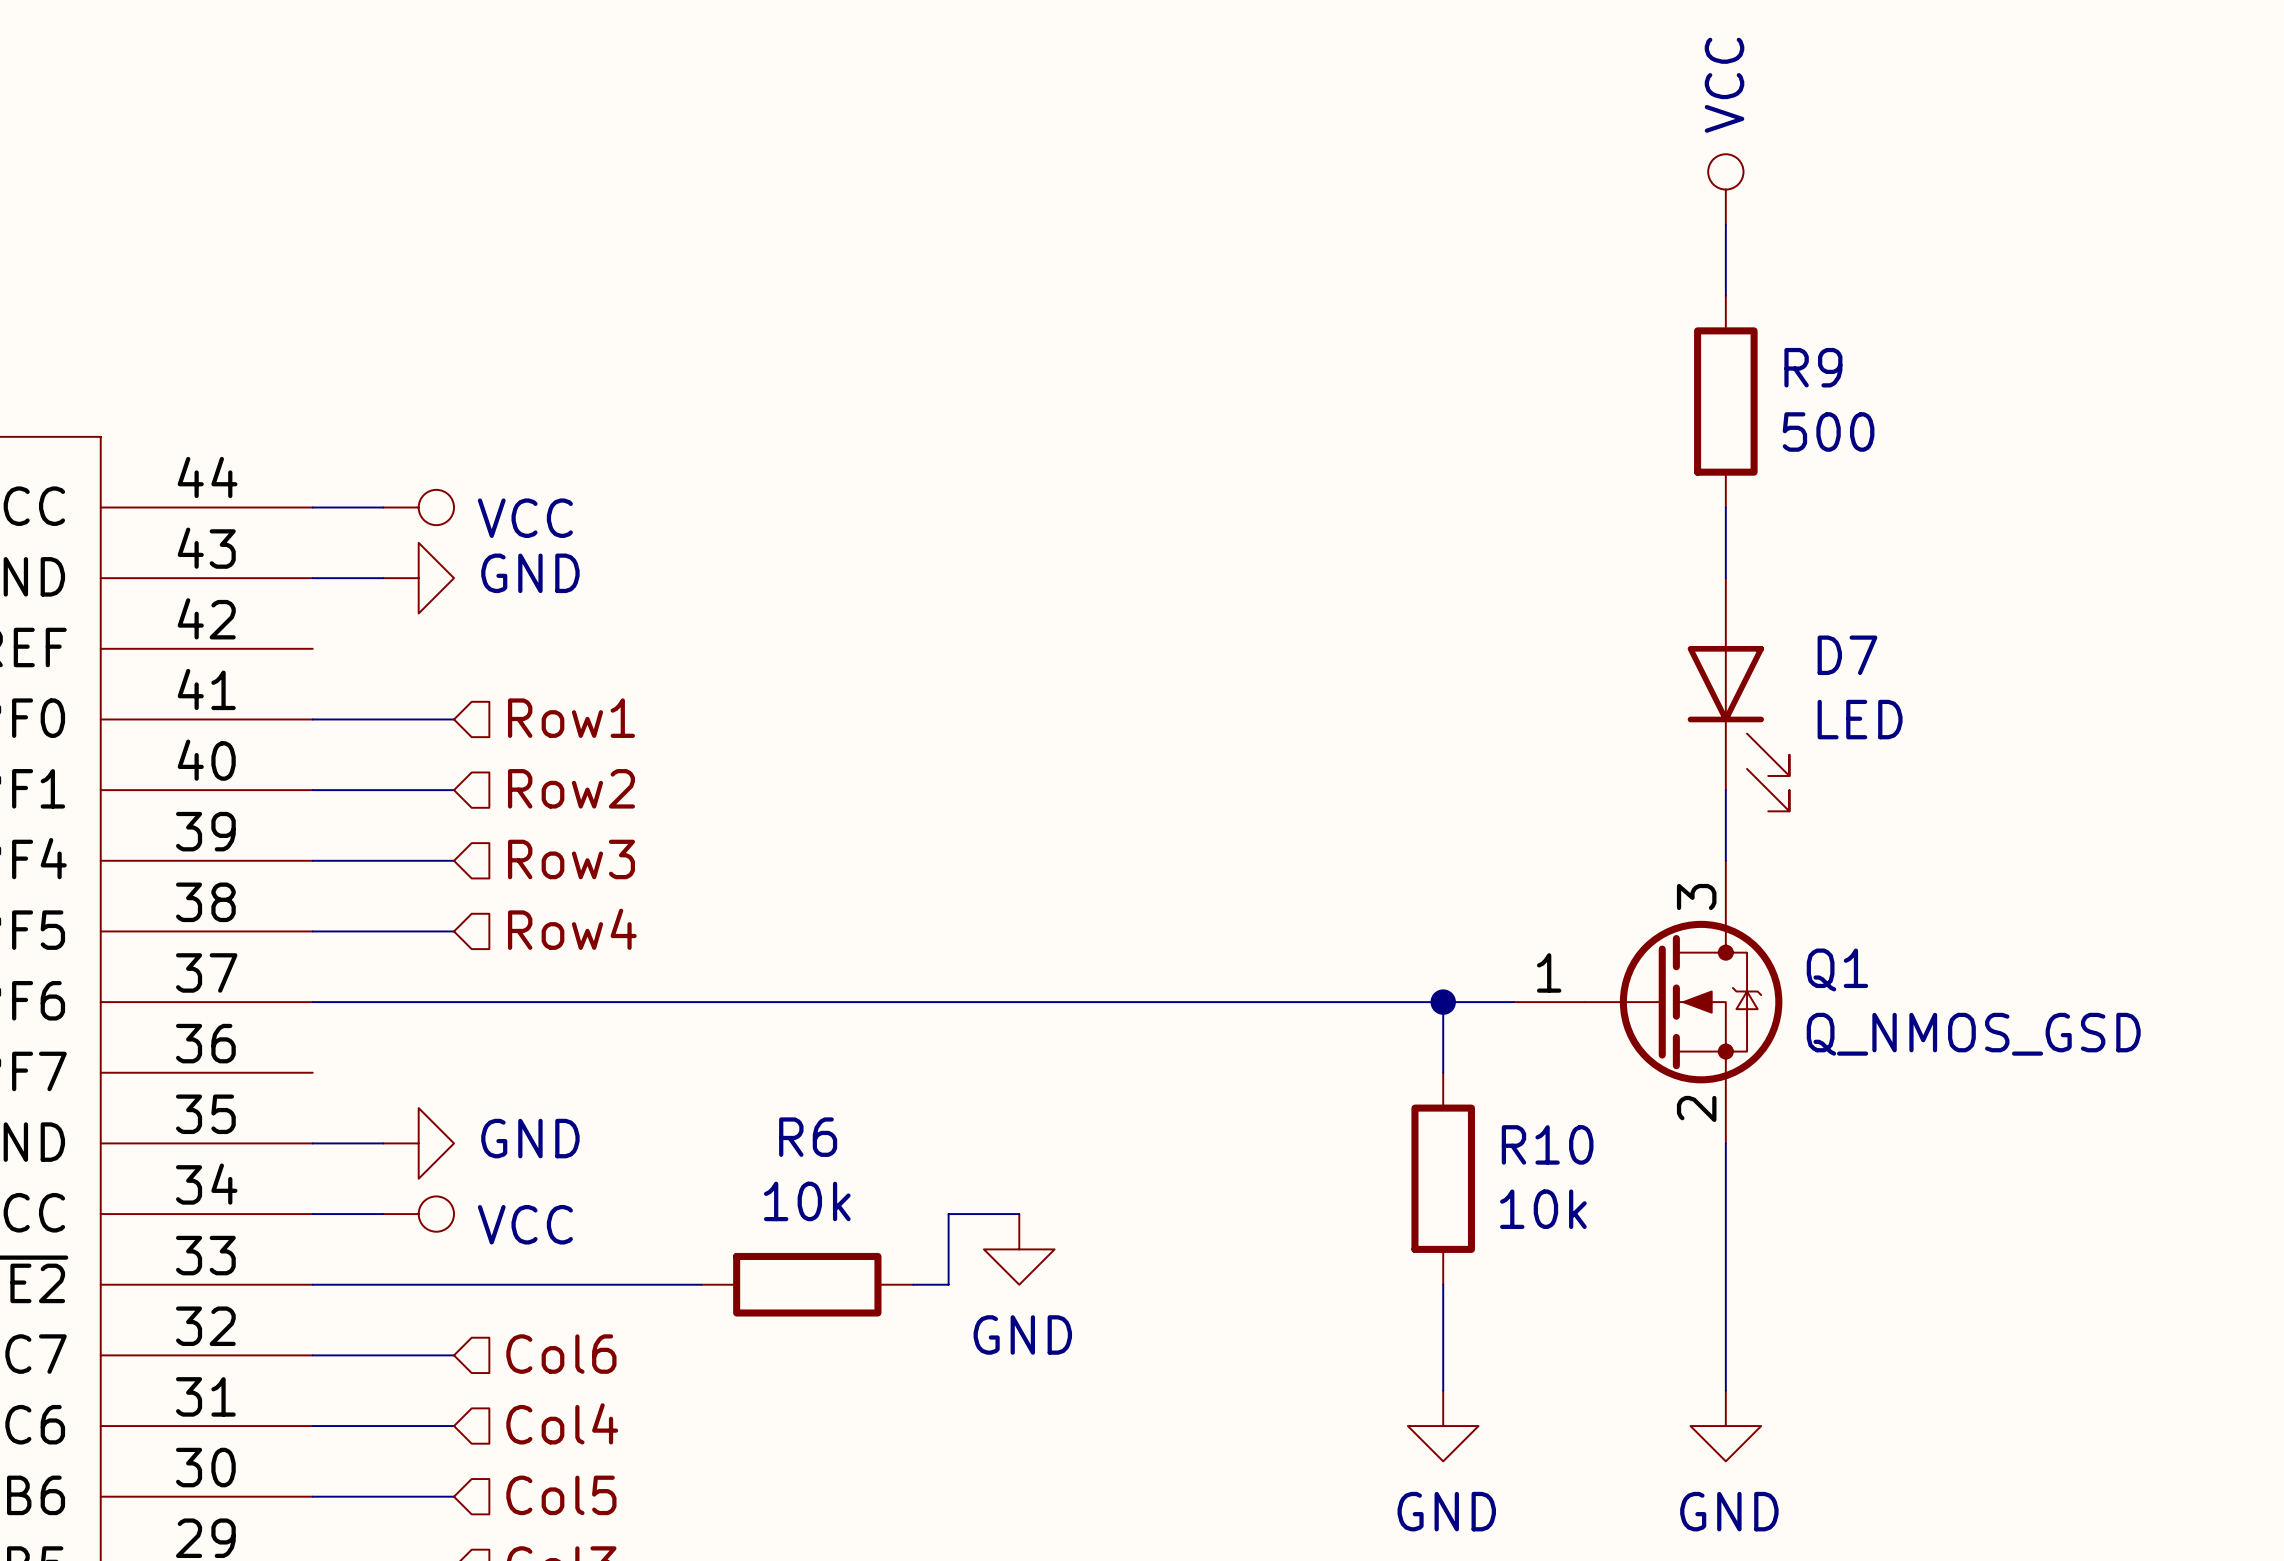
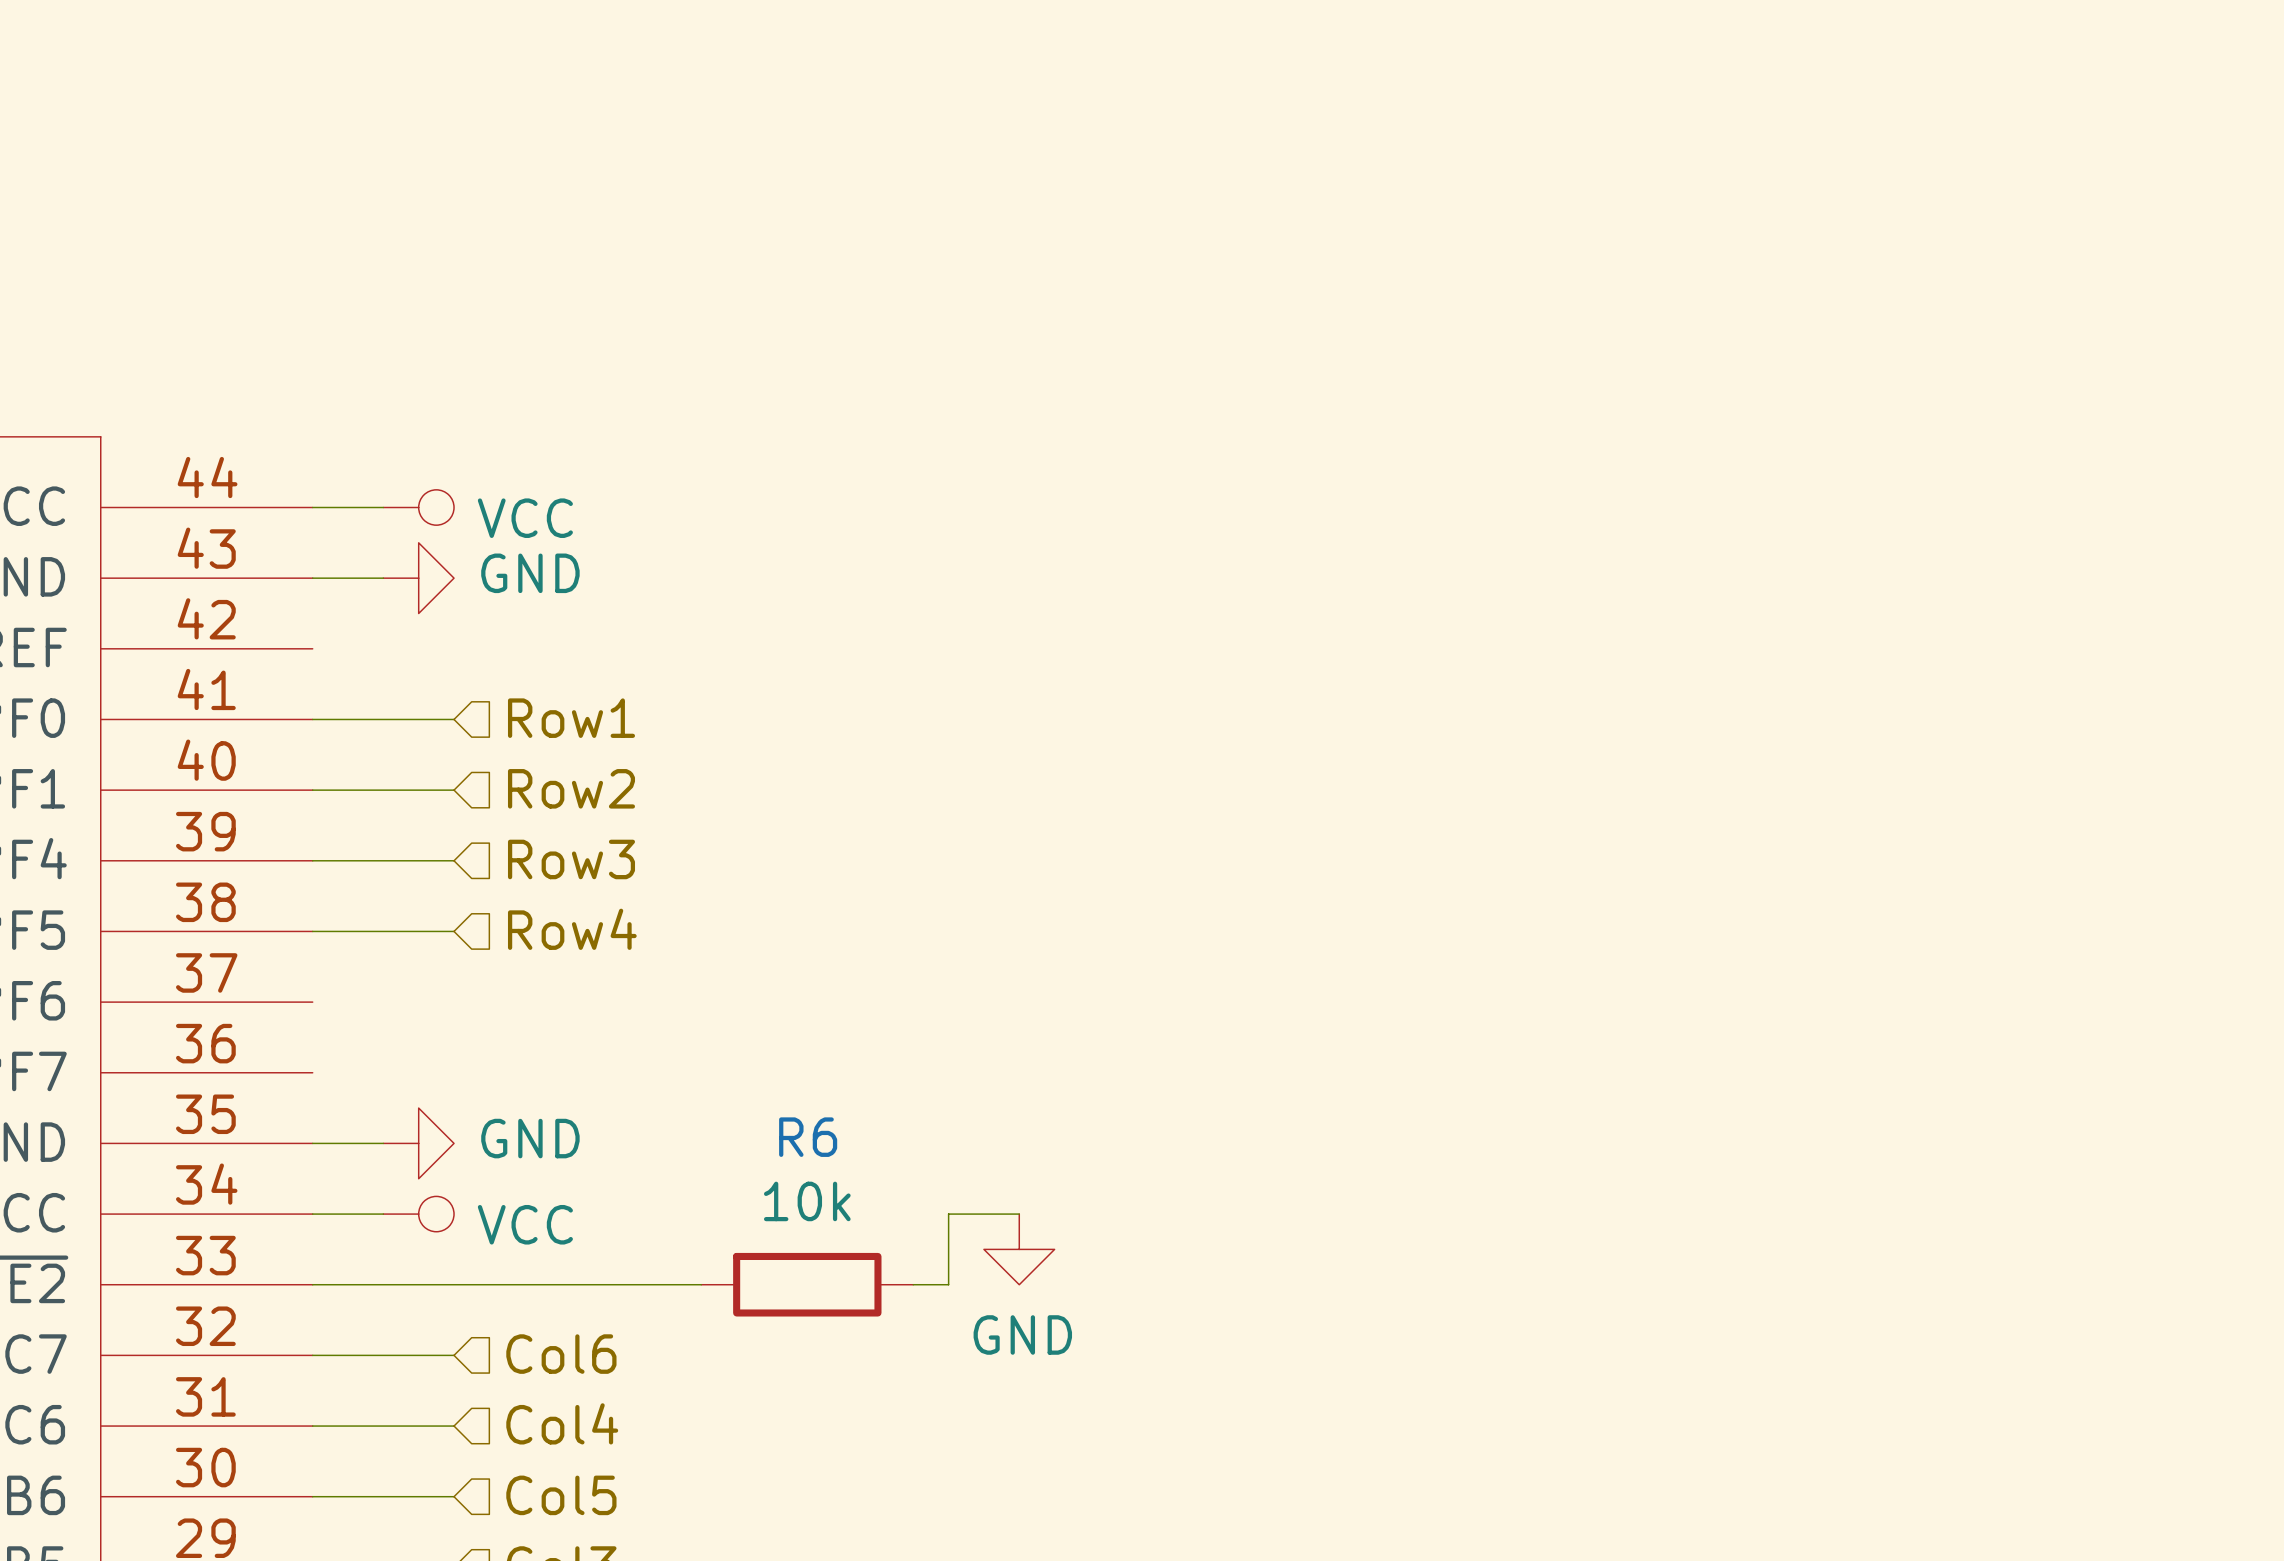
power symbol: VCC (1725, 189) -> none
wire: (1725, 224) (1725, 295) -> none
R9: 500 (1725, 401) -> none
wire: (1725, 507) (1725, 578) -> none
D7: LED (1738, 694) -> none
wire: (1725, 790) (1725, 860) -> none
wire: (312, 1002) (1513, 1002) -> none
wire: (1443, 1002) (1443, 1072) -> none
junction: (1443, 1002) -> none
Q1: Q_NMOS_GSD (1648, 1002) -> none
wire: (1725, 1143) (1725, 1390) -> none
R10: 10k (1443, 1178) -> none
wire: (1443, 1284) (1443, 1390) -> none
power symbol: GND (1443, 1426) -> none
power symbol: GND (1725, 1426) -> none

